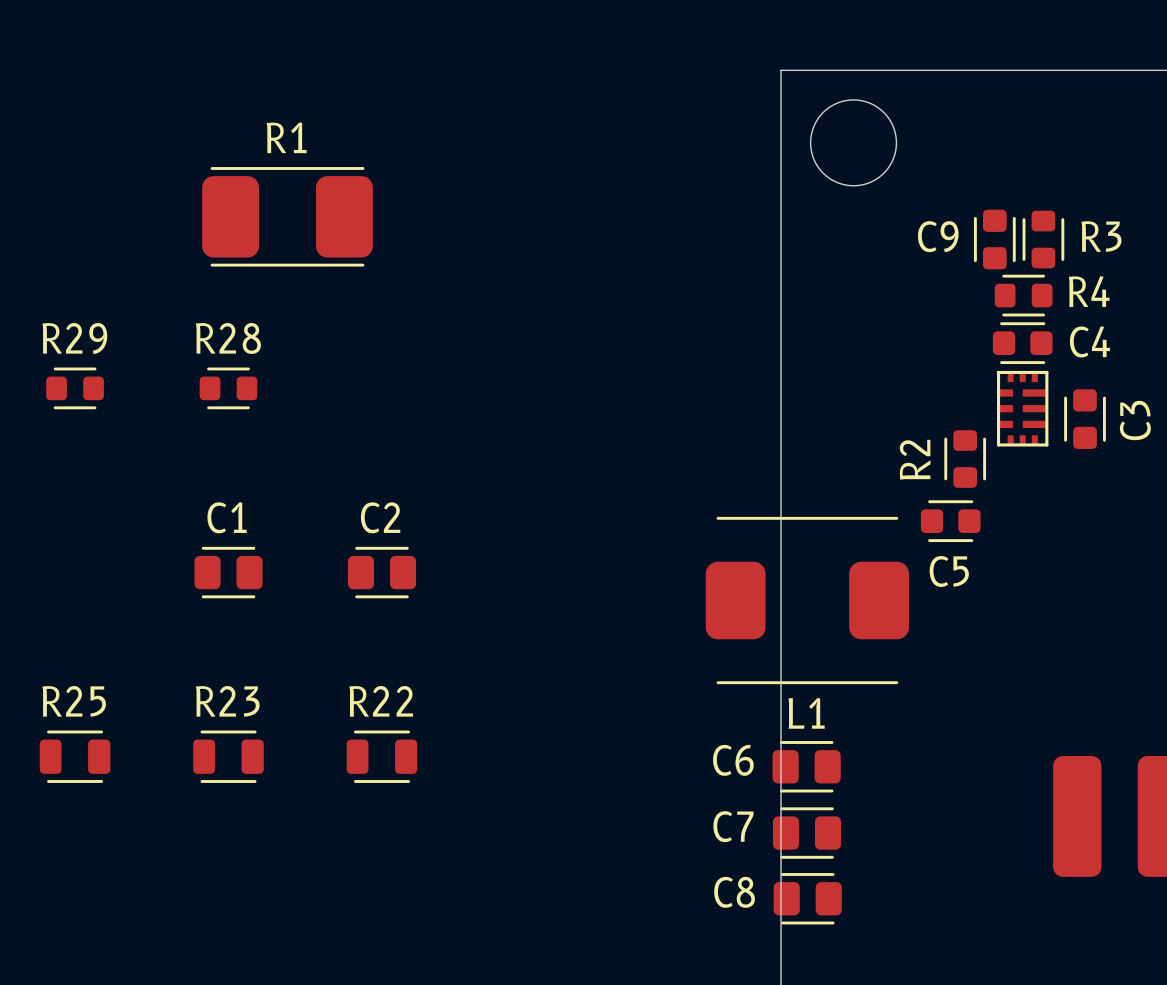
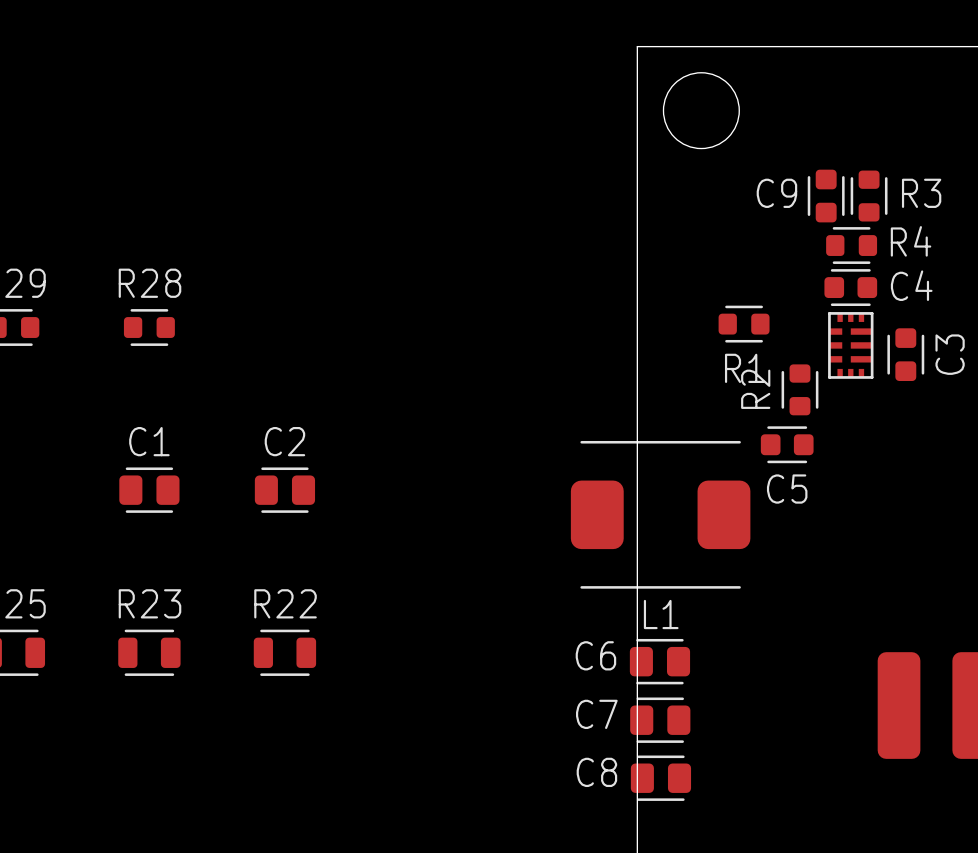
R1 name position: R1 (286, 137) -> R1 (744, 368)
R1 footprint: [202, 167, 373, 267] -> [718, 305, 770, 343]

